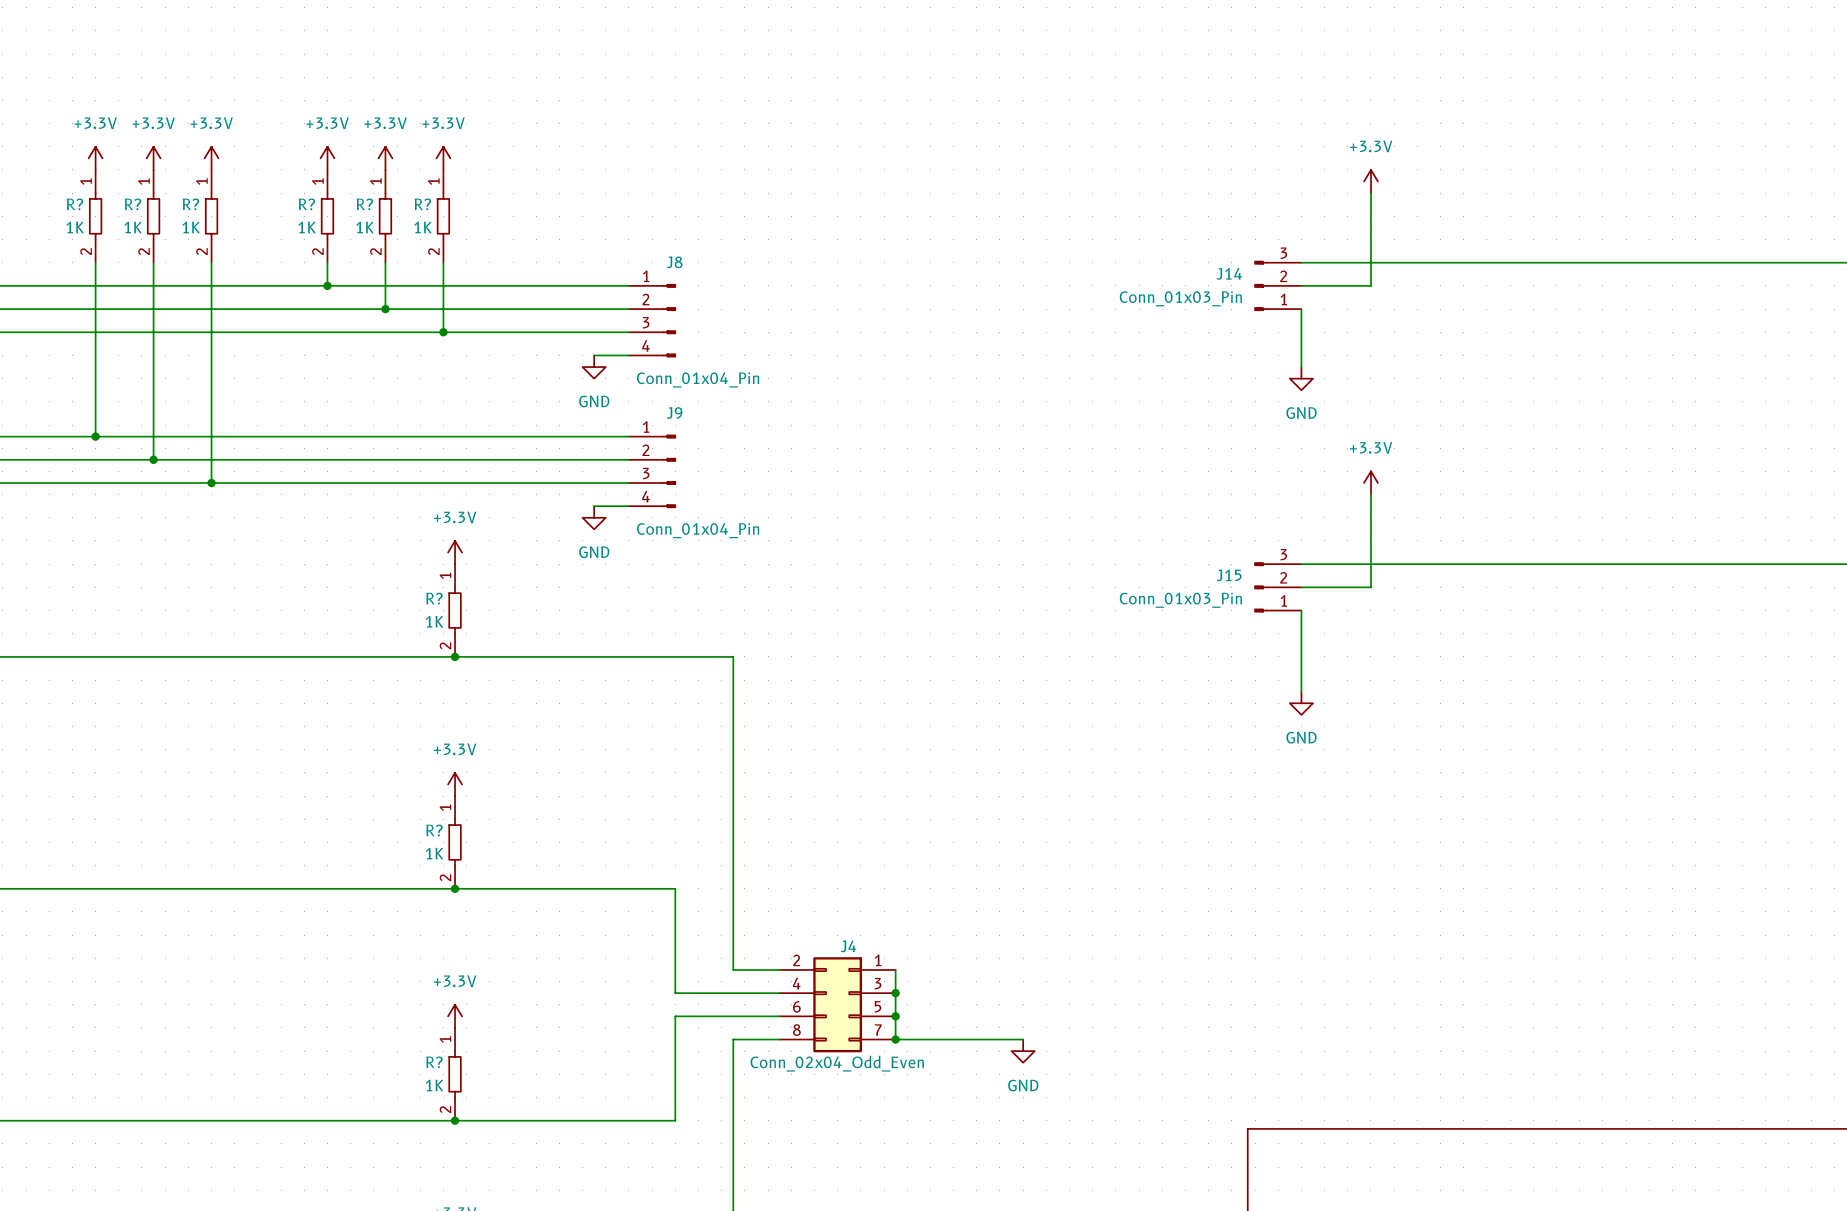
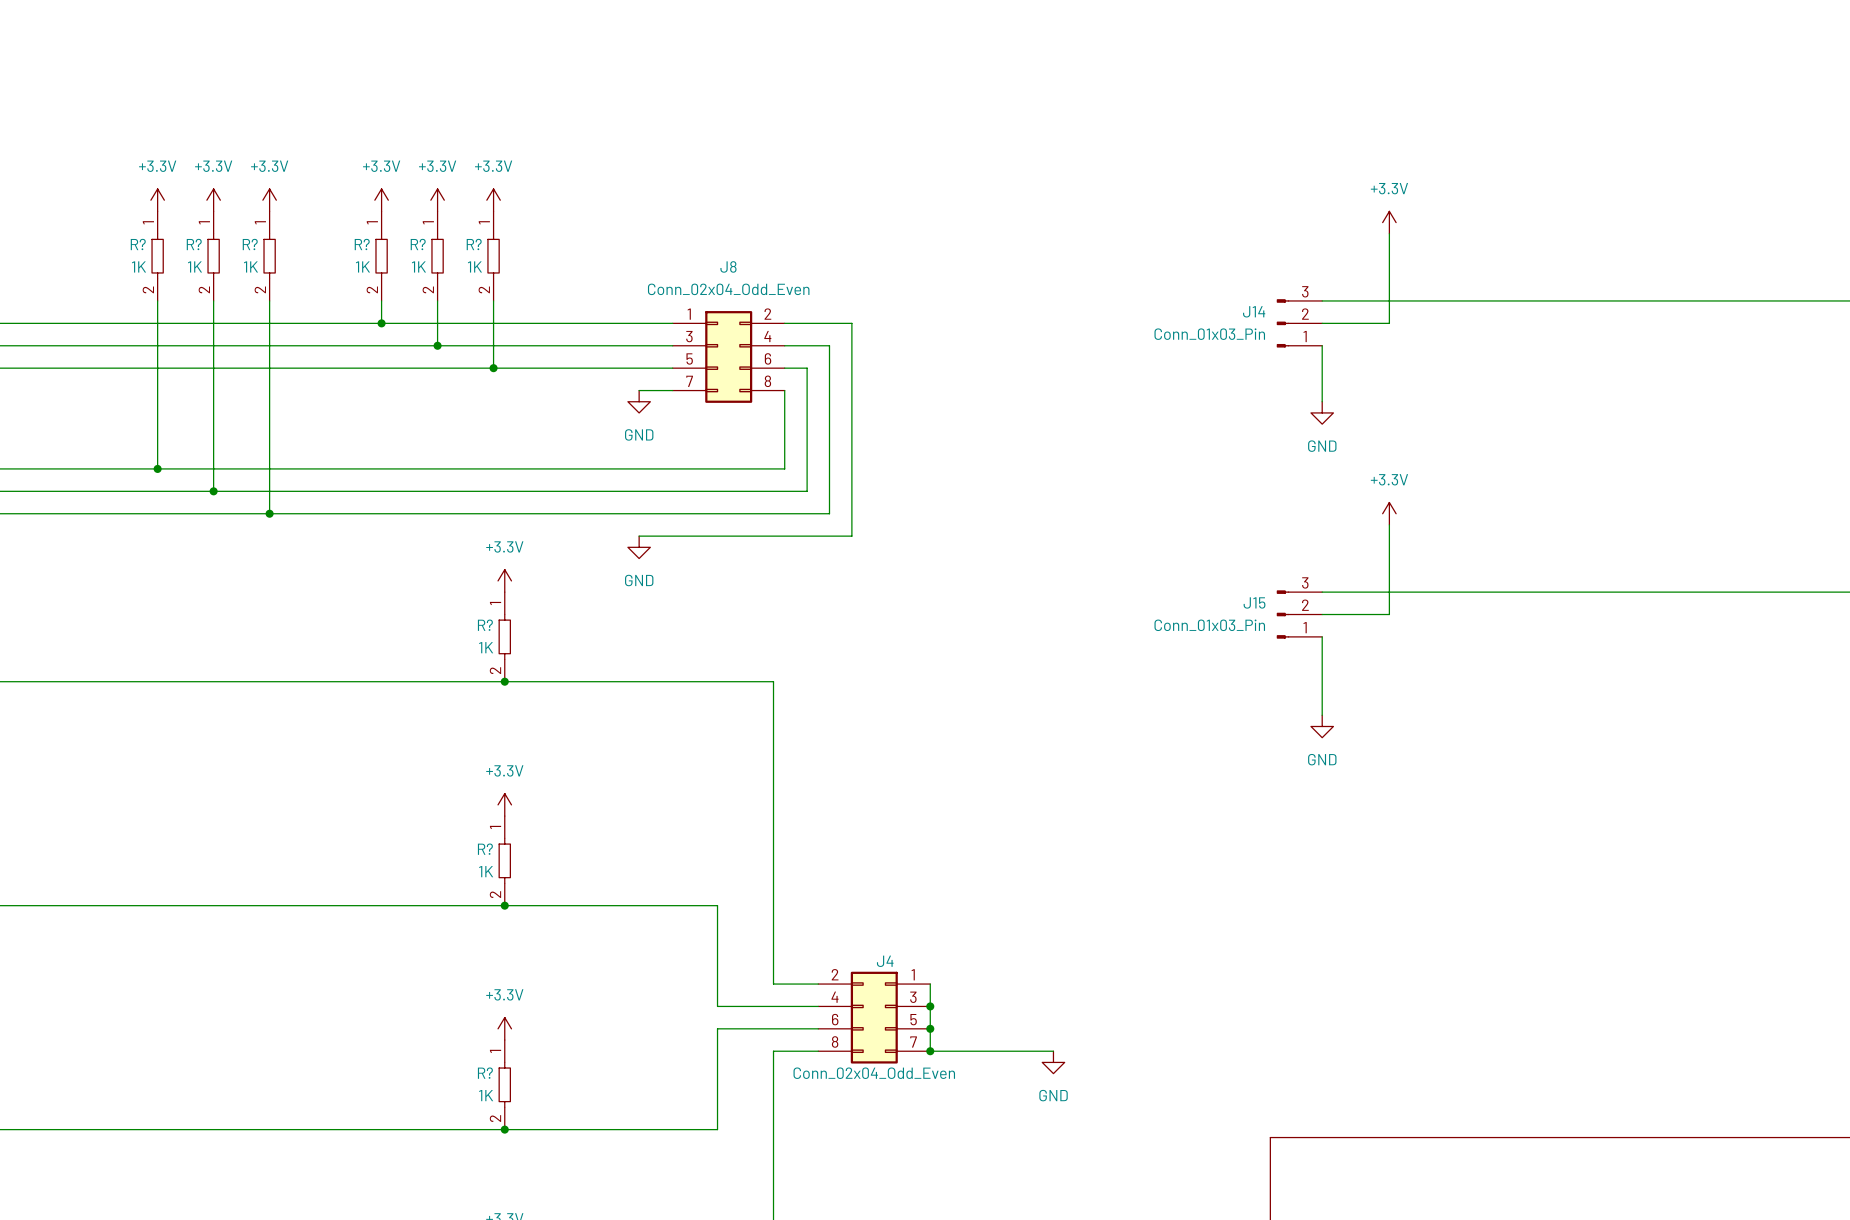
J8 name position: J8 (674, 262) -> J8 (728, 266)
J8 symbol: [628, 284, 677, 358] -> [672, 311, 785, 403]
wire: none -> (784, 323) (851, 323) (851, 536) (672, 536)
wire: none -> (784, 345) (829, 345) (829, 513) (672, 513)
wire: none -> (784, 368) (807, 368) (807, 491) (672, 491)
wire: none -> (784, 390) (784, 468) (672, 468)
J8 value: Conn_01x04_Pin (698, 379) -> Conn_02x04_Odd_Even (728, 289)
J9: Conn_01x04_Pin (652, 471) -> none

